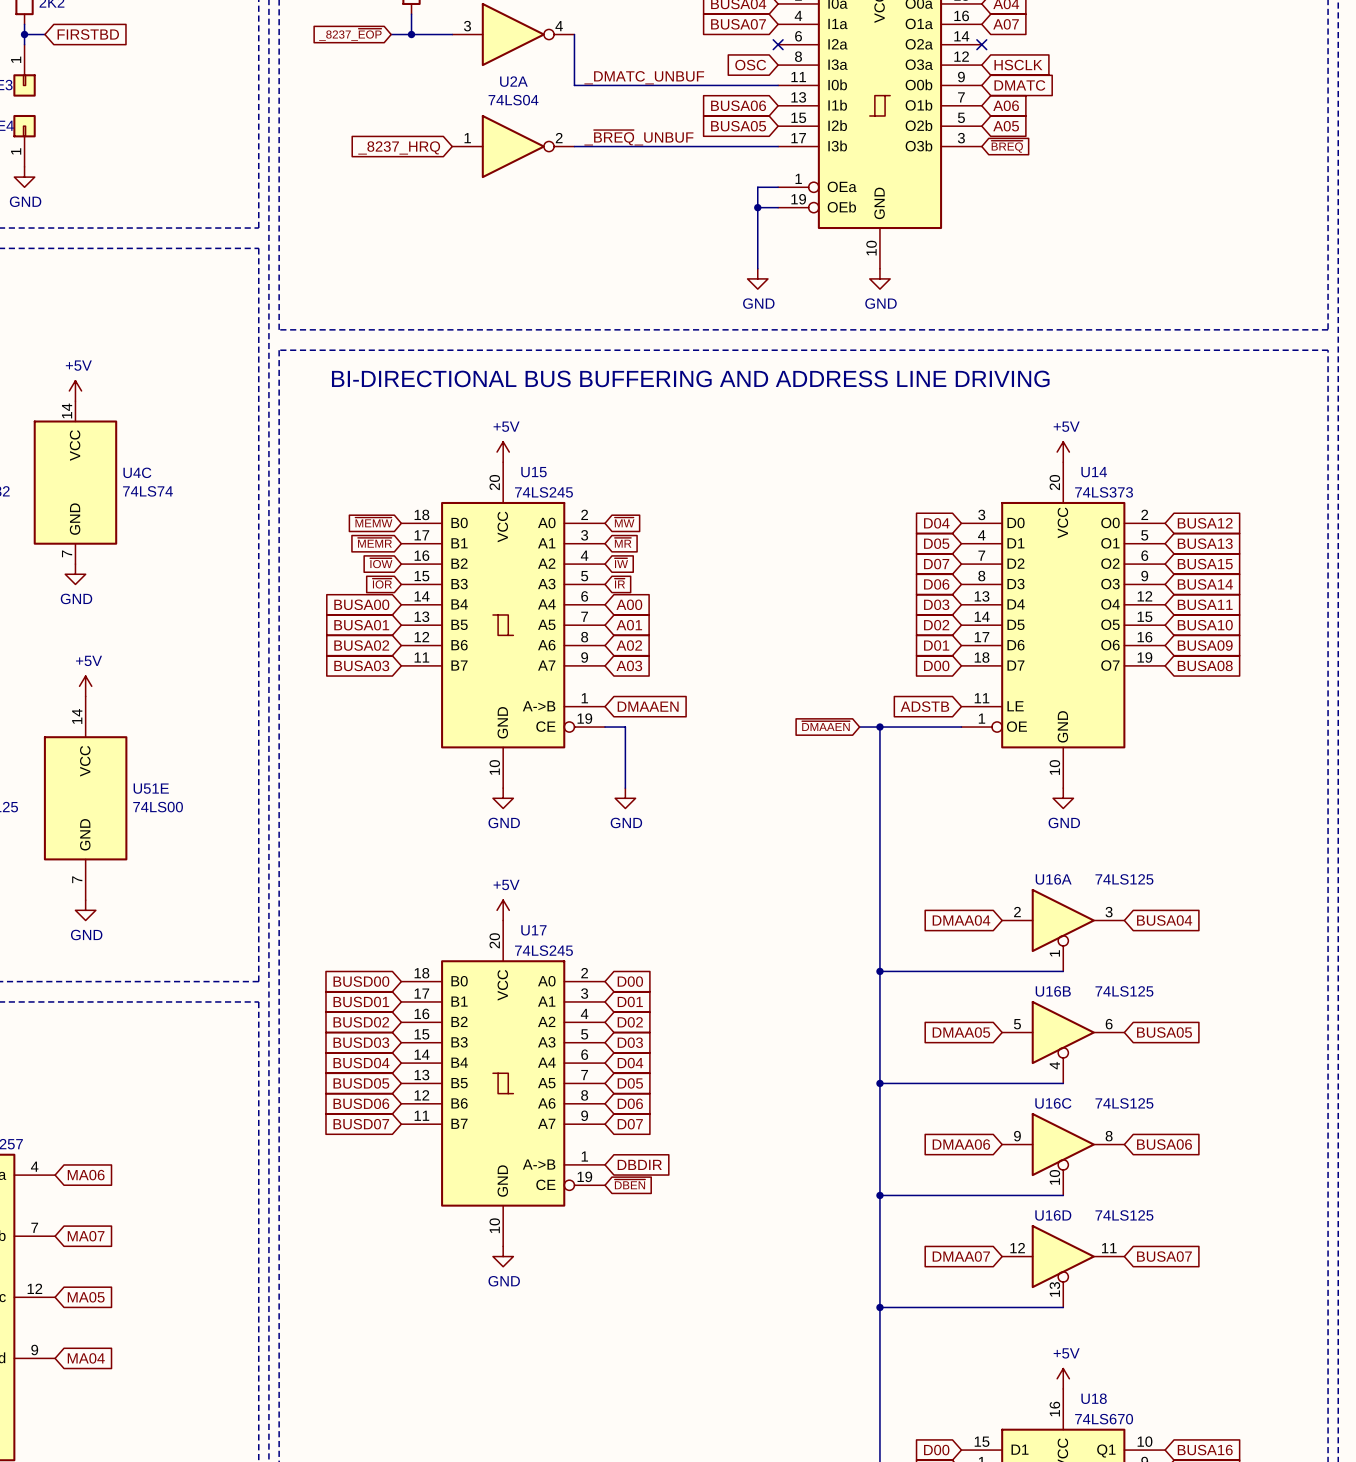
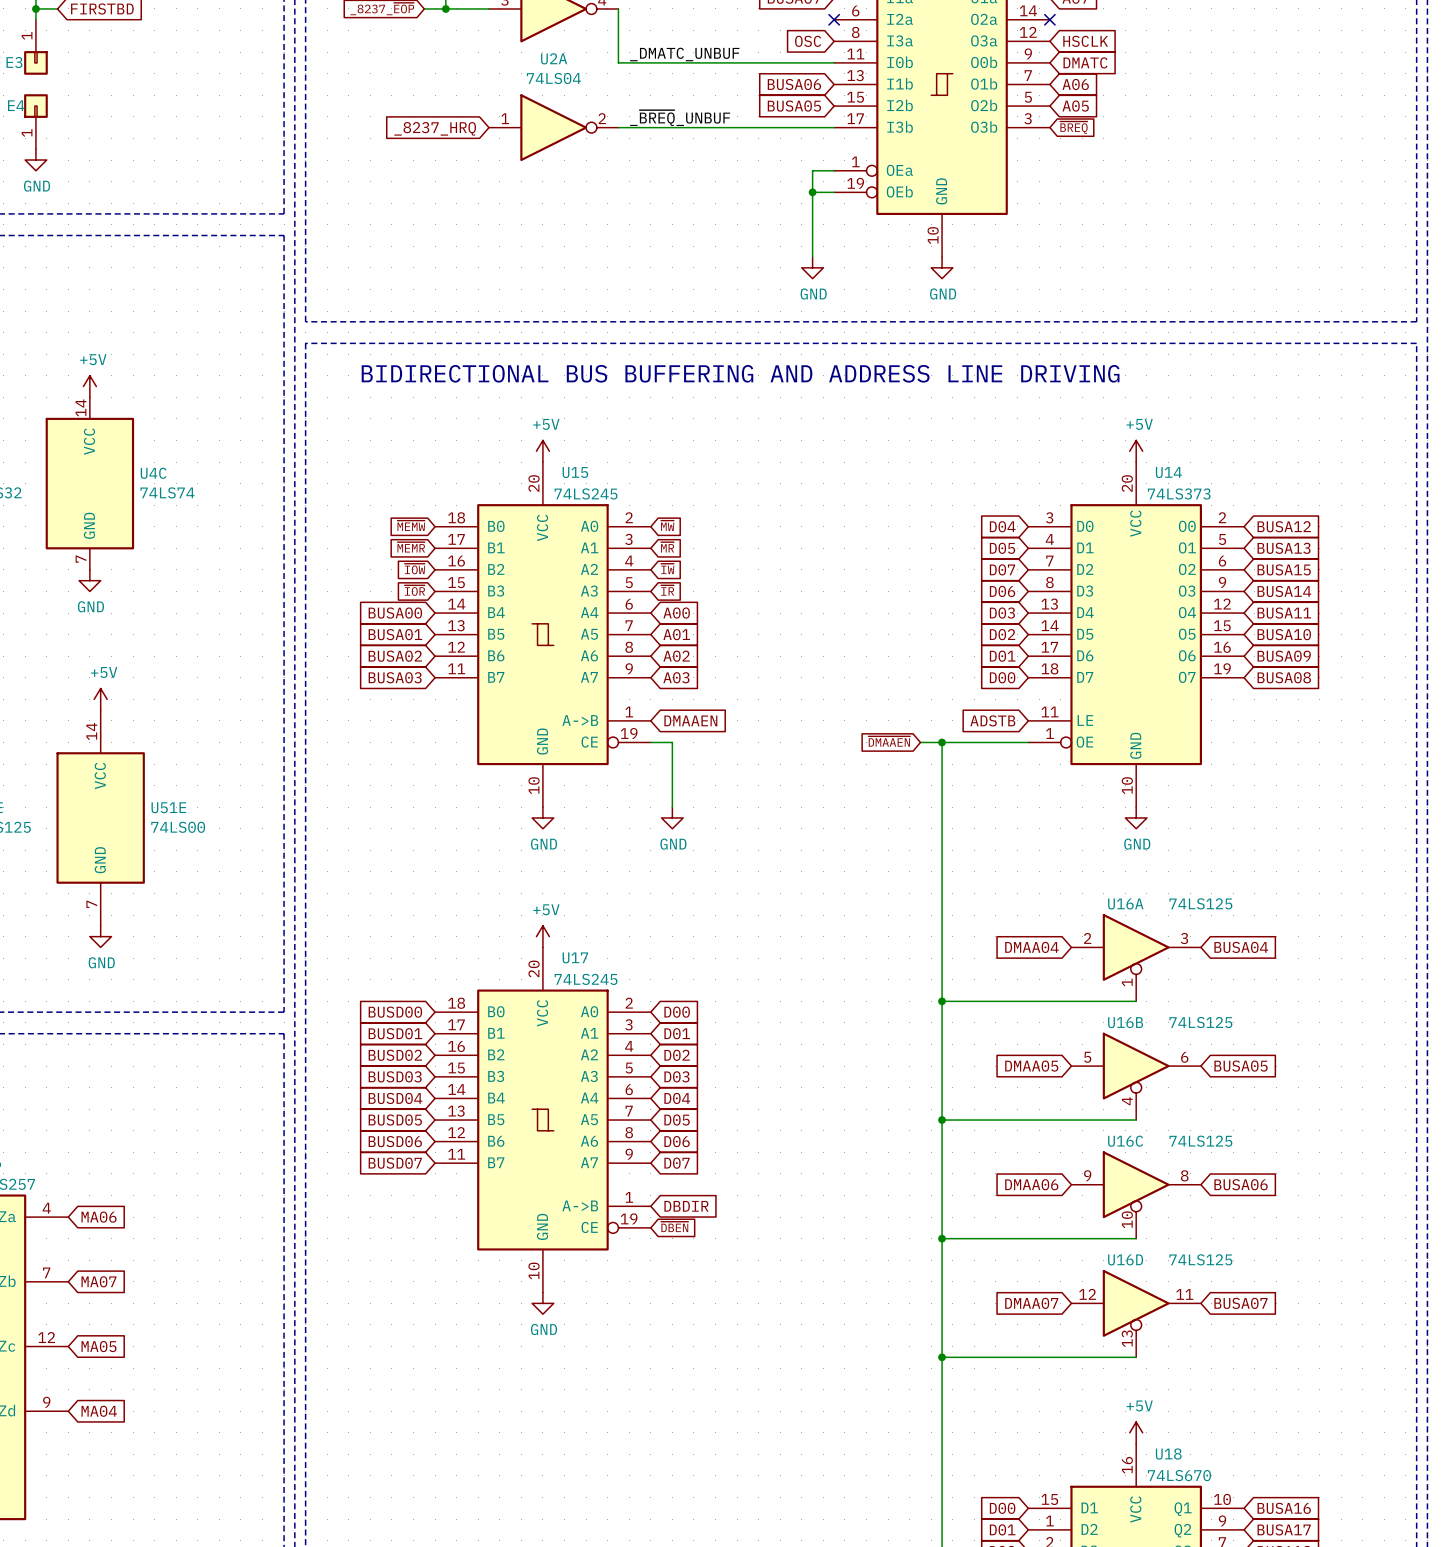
text: BI-DIRECTIONAL BUS BUFFERING AND ADDRESS LINE DRIVING (690, 378) -> BIDIRECTIONAL BUS BUFFERING AND ADDRESS LINE DRIVING (740, 373)

